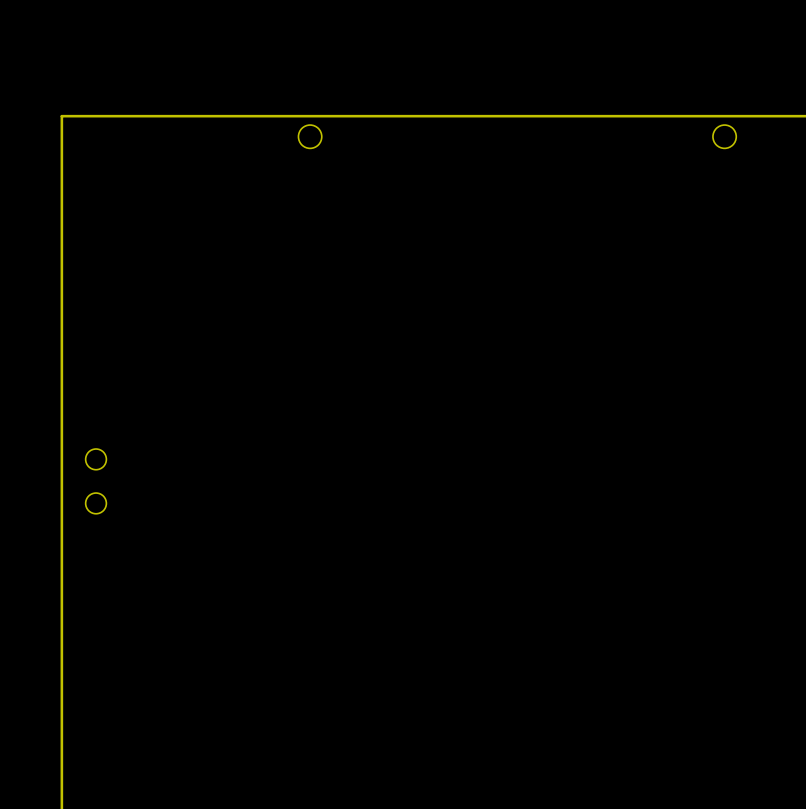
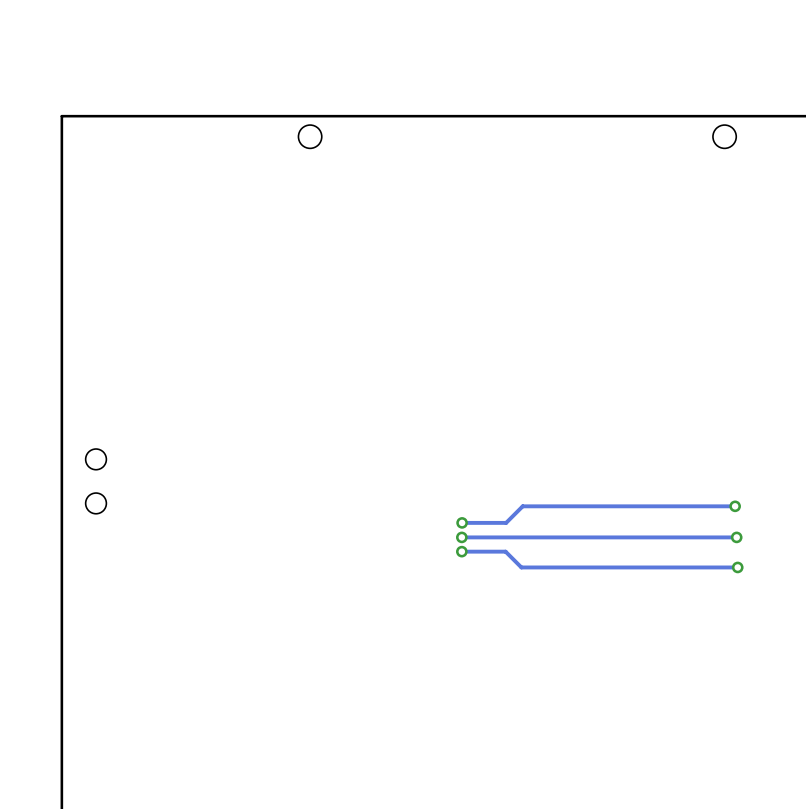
track: none -> (735, 506) (522, 506) (506, 522) (462, 522)
via: none -> (735, 506)
via: none -> (462, 522)
via: none -> (461, 537)
track: none -> (736, 537) (461, 537)
via: none -> (736, 537)
track: none -> (461, 551) (505, 551) (521, 567) (737, 567)
via: none -> (461, 551)
via: none -> (737, 567)

